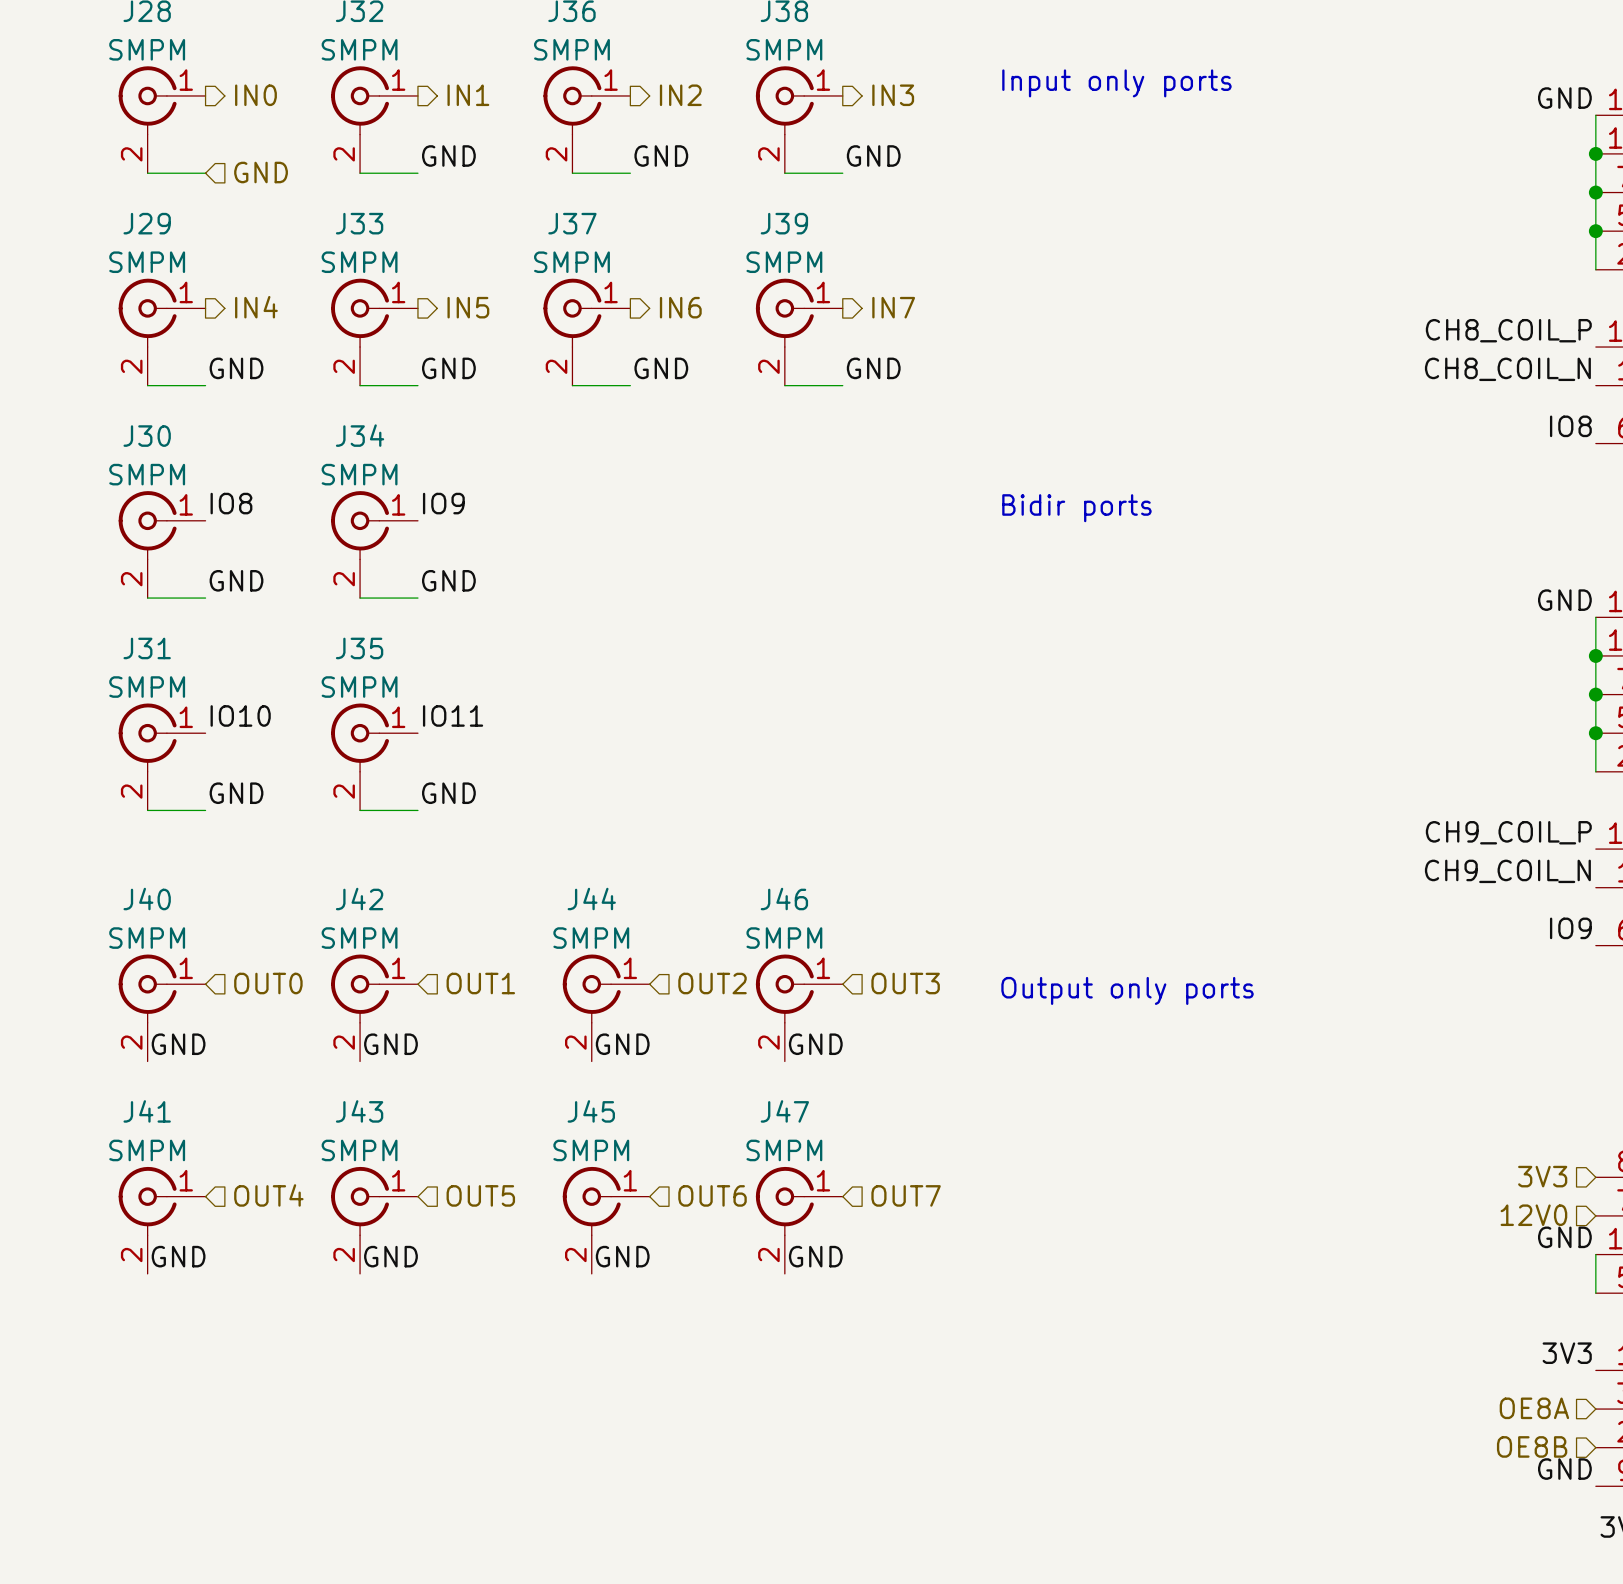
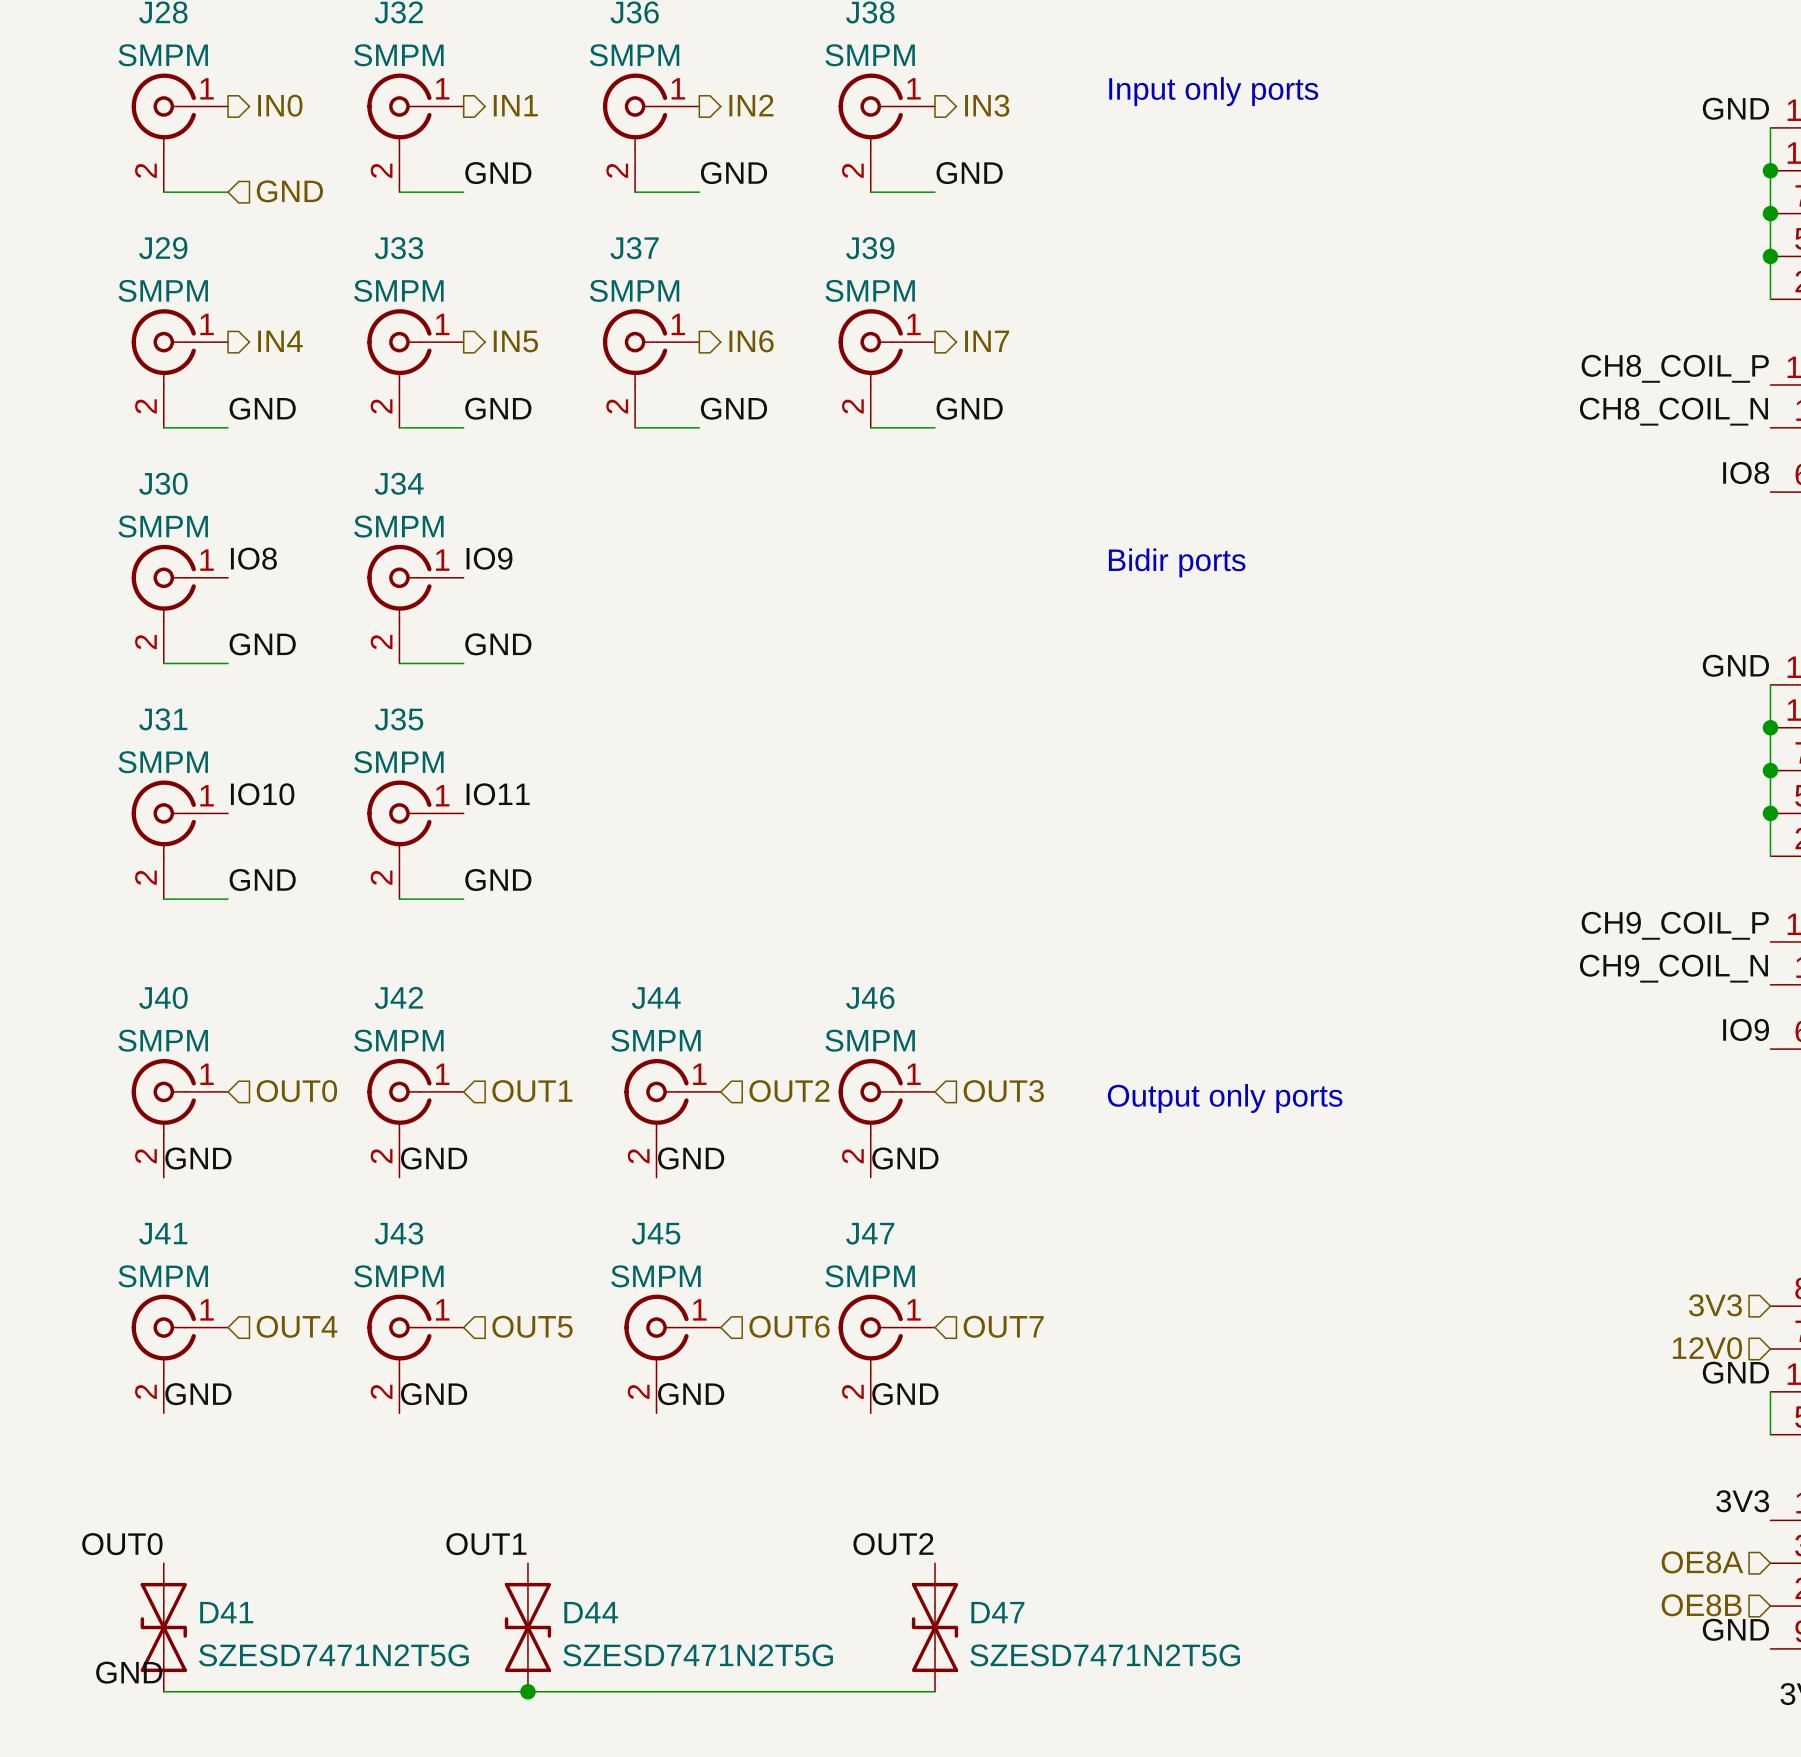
label: none -> OUT0 (122, 1544)
label: none -> OUT1 (486, 1544)
label: none -> OUT2 (893, 1544)
D41: none -> SZESD7471N2T5G (163, 1627)
D44: none -> SZESD7471N2T5G (527, 1627)
D47: none -> SZESD7471N2T5G (935, 1627)
label: none -> GND (129, 1672)
wire: none -> (163, 1691) (935, 1691)
junction: none -> (527, 1691)

